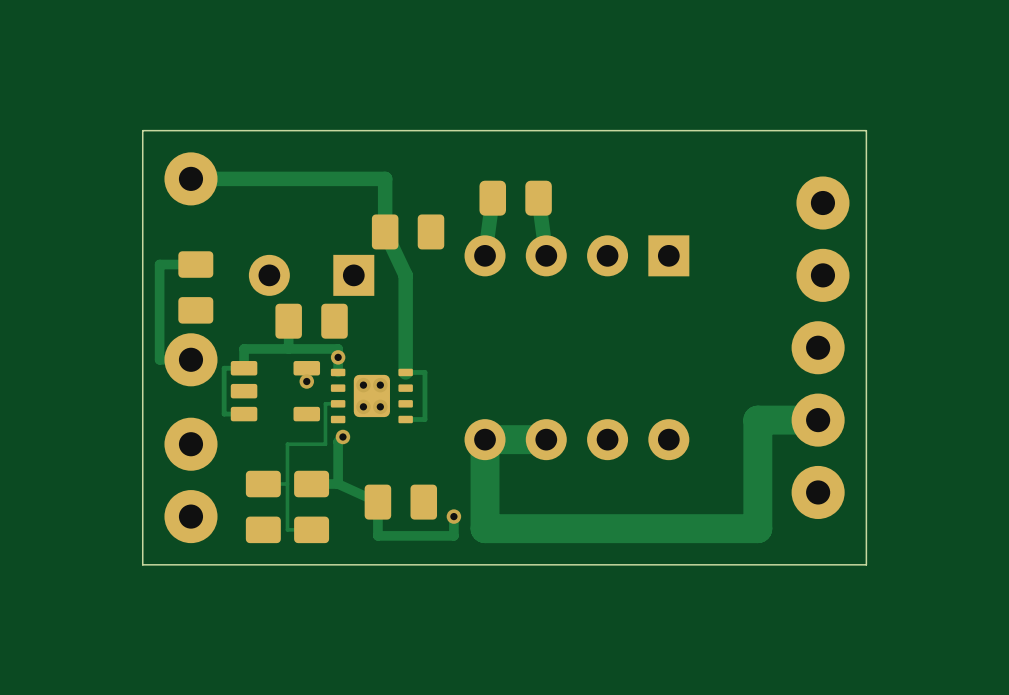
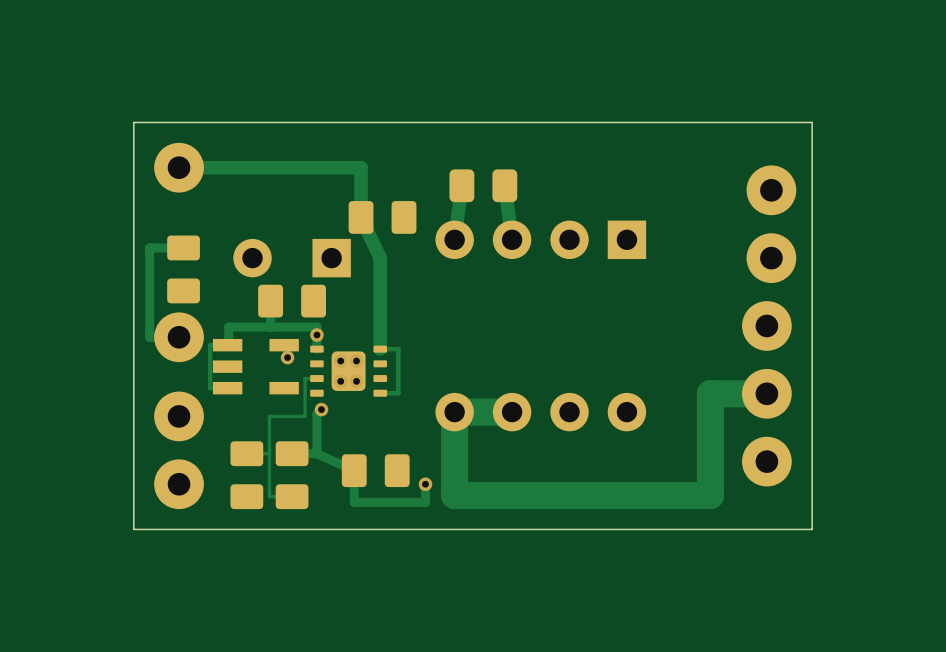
part footprint: [230, 361, 321, 422] -> [212, 338, 299, 395]

